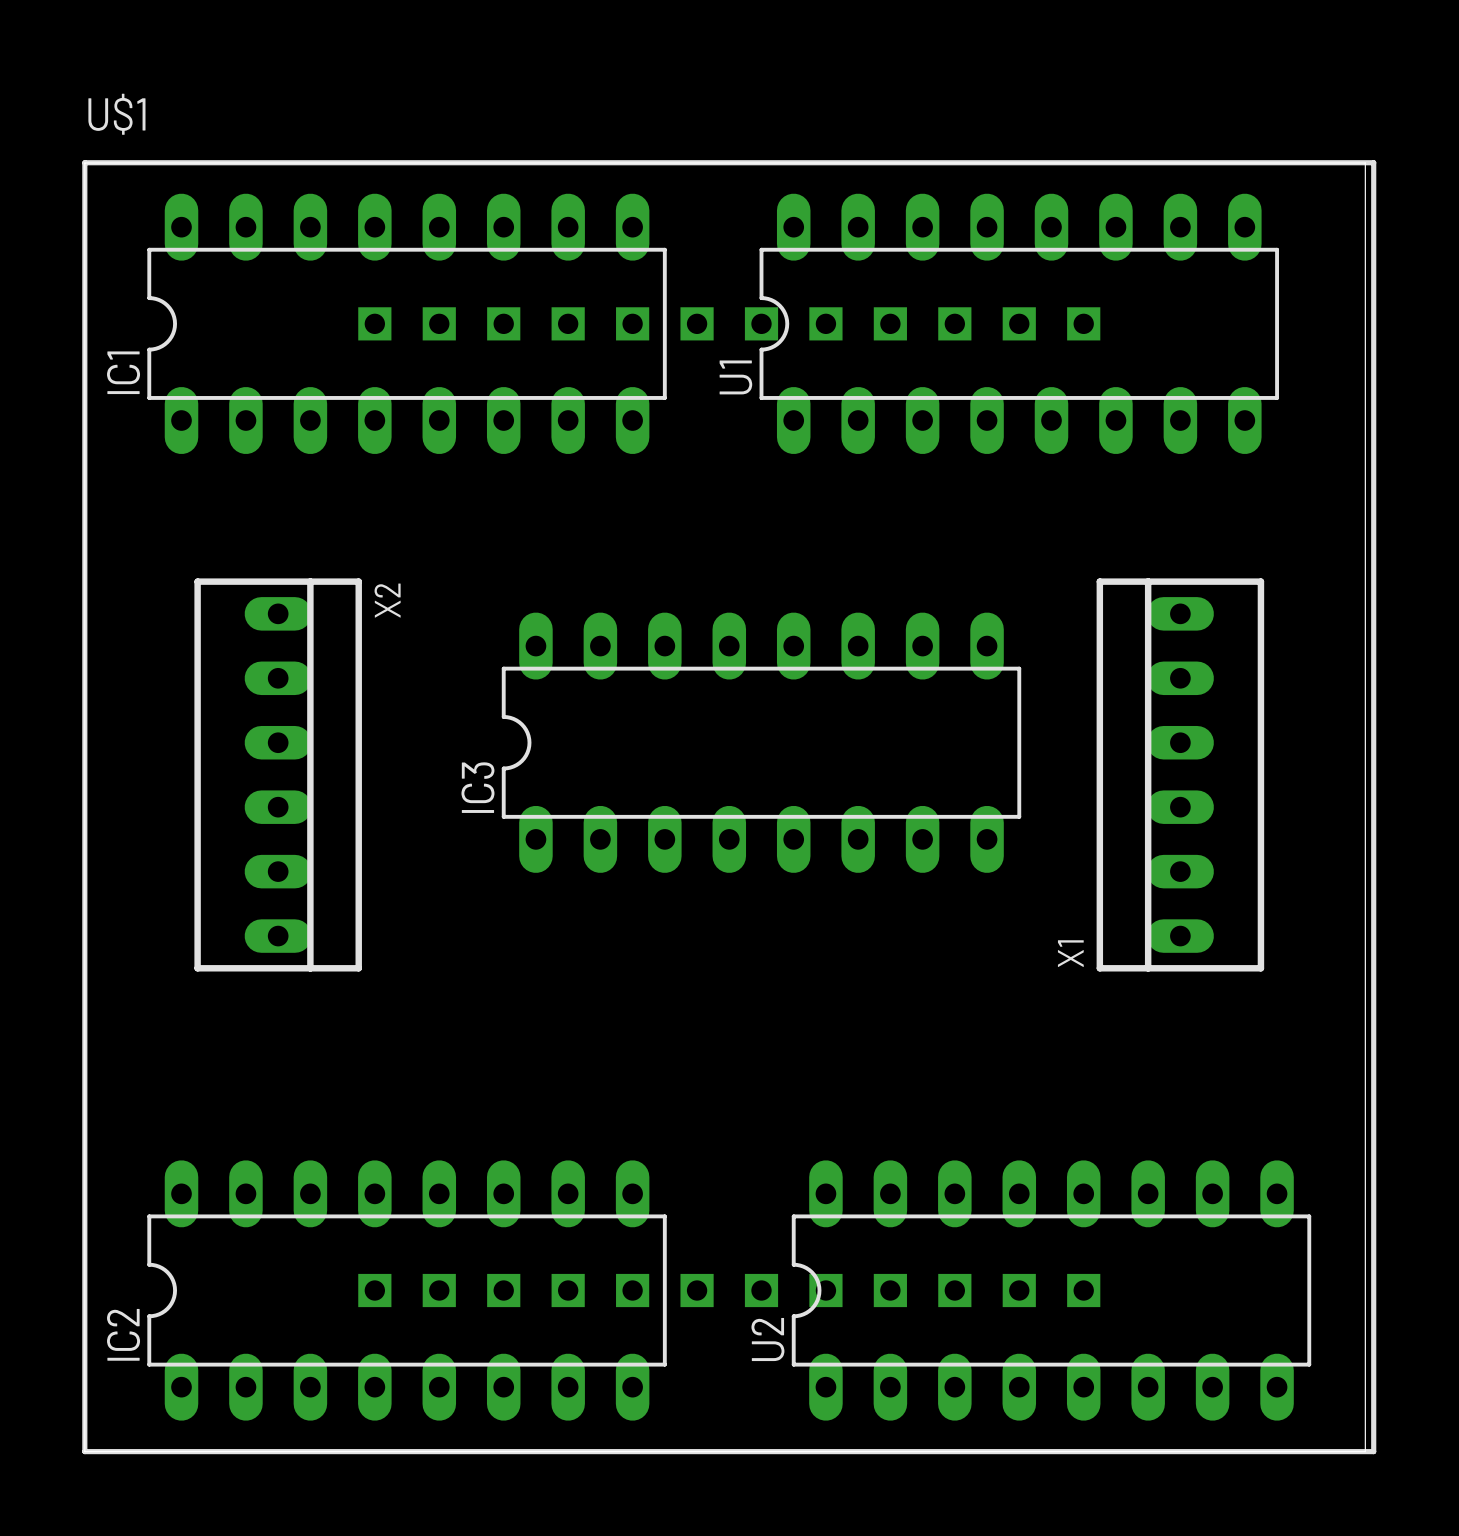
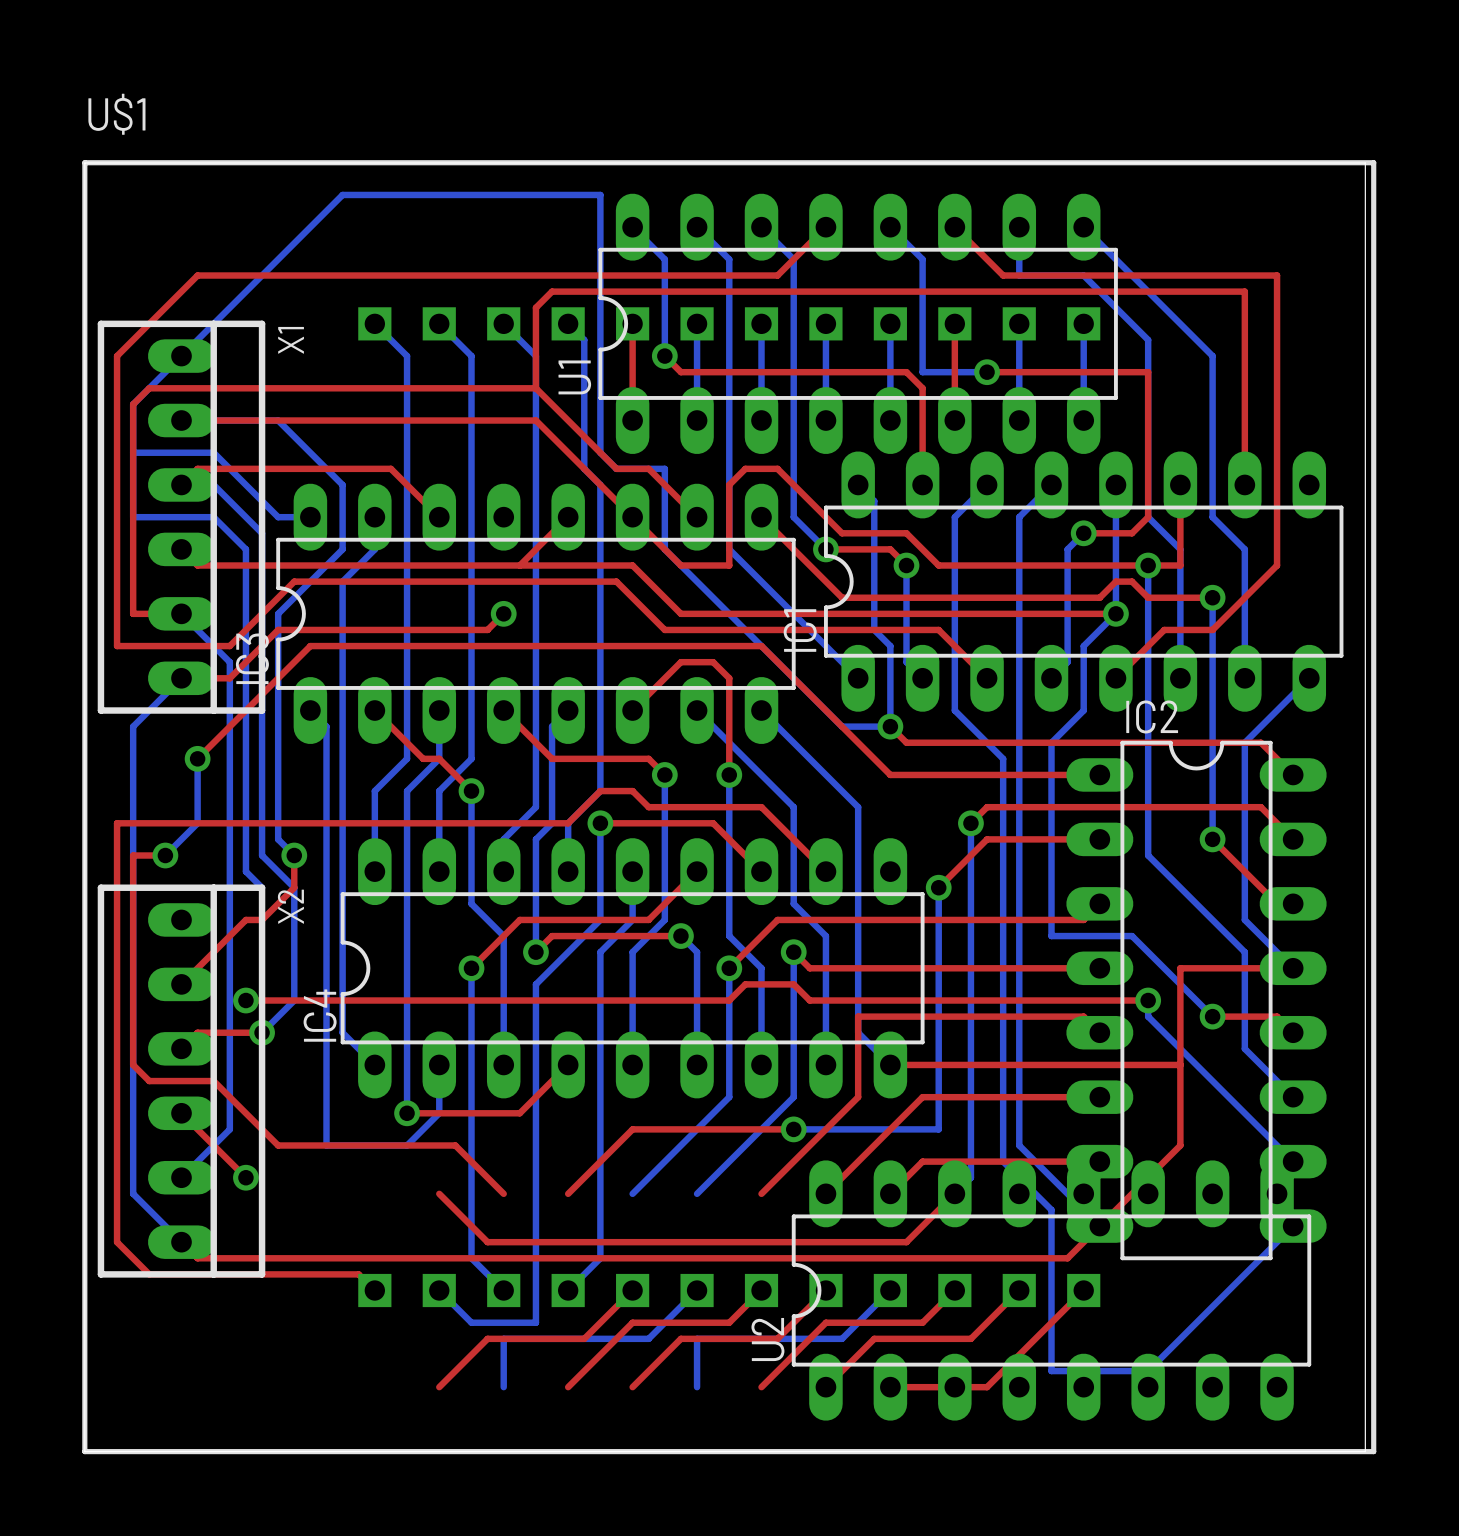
bottom track: none -> (632, 227) (664, 259) (664, 356)
bottom track: none -> (697, 227) (729, 259) (729, 549) (858, 678)
bottom track: none -> (761, 227) (793, 259) (793, 517) (825, 549)
top track: none -> (825, 227) (777, 275) (197, 275) (117, 356) (117, 646) (229, 646) (294, 581) (616, 581) (664, 629) (938, 629) (987, 678)
bottom track: none -> (890, 227) (922, 259) (922, 372) (987, 372)
top track: none -> (954, 227) (1003, 275) (1277, 275) (1277, 565) (1212, 629) (1164, 629) (1115, 678)
bottom track: none -> (1019, 227) (1019, 275) (1083, 275) (1148, 339) (1148, 517) (1180, 549) (1180, 678)
bottom track: none -> (1083, 227) (1212, 356) (1212, 517) (1244, 549) (1244, 678)
bottom track: none -> (374, 323) (407, 356) (407, 758) (374, 791) (374, 871)
IC1 position: (407, 323) -> (1083, 581)
bottom track: none -> (439, 323) (471, 356) (471, 758) (439, 791) (439, 871)
bottom track: none -> (503, 323) (535, 356) (535, 807) (503, 839) (503, 871)
bottom track: none -> (568, 323) (584, 339) (584, 468) (600, 484) (600, 791) (568, 823) (568, 871)
top track: none -> (632, 323) (632, 420)
bottom track: none -> (697, 323) (697, 420)
bottom track: none -> (761, 323) (761, 420)
bottom track: none -> (825, 323) (825, 420)
bottom track: none -> (890, 323) (890, 420)
top track: none -> (954, 323) (954, 420)
bottom track: none -> (1019, 323) (1019, 420)
U1 position: (1019, 323) -> (858, 323)
bottom track: none -> (1083, 323) (1083, 420)
top track: none -> (664, 356) (680, 372) (906, 372) (922, 388) (922, 484)
via: none -> (664, 356)
top track: none -> (987, 372) (1148, 372) (1148, 517) (1132, 533) (1083, 533)
via: none -> (987, 372)
top track: none -> (535, 388) (616, 468) (648, 468) (697, 517)
top track: none -> (535, 388) (149, 388) (133, 404) (133, 613) (181, 613)
top track: none -> (535, 388) (535, 307) (552, 291) (1244, 291) (1244, 484)
top track: none -> (181, 420) (535, 420) (680, 565) (729, 565) (729, 484) (745, 468) (777, 468) (842, 533) (906, 533) (938, 565) (1180, 565) (1180, 484)
bottom track: none -> (181, 420) (278, 420) (342, 484) (342, 549) (278, 613) (278, 839) (294, 855)
bottom track: none -> (133, 452) (213, 452) (278, 517) (310, 517)
top track: none -> (181, 484) (197, 468) (390, 468) (439, 517)
bottom track: none -> (181, 484) (213, 484) (262, 533) (262, 855) (294, 887) (294, 1000) (262, 1032)
bottom track: none -> (858, 484) (874, 501) (874, 629) (890, 646) (890, 726) (842, 726) (664, 549) (664, 468) (616, 468) (600, 452) (600, 194) (342, 194) (133, 404) (133, 517) (213, 517) (245, 549) (245, 871) (262, 887)
bottom track: none -> (987, 484) (954, 517) (954, 710) (1003, 758) (1003, 1161) (1051, 1209) (1051, 1371) (1148, 1371) (1293, 1226)
bottom track: none -> (1051, 484) (1019, 517) (1019, 1145) (1099, 1226)
bottom track: none -> (1115, 484) (1115, 613) (1083, 646) (1083, 710) (1051, 742) (1051, 936) (1132, 936) (1212, 1016)
bottom track: none -> (374, 517) (374, 549) (342, 581) (342, 1032) (374, 1064)
top track: none -> (568, 517) (519, 565)
top track: none -> (761, 517) (842, 597) (1099, 597) (1115, 581) (1132, 581) (1148, 597) (1212, 597)
bottom track: none -> (1083, 533) (1067, 549) (1067, 662) (1051, 678)
via: none -> (1083, 533)
top track: none -> (181, 549) (197, 565) (632, 565) (680, 613) (1115, 613)
top track: none -> (825, 549) (890, 549) (906, 565)
via: none -> (825, 549)
bottom track: none -> (906, 565) (906, 662) (922, 678)
via: none -> (906, 565)
bottom track: none -> (1148, 565) (1148, 855) (1244, 952) (1244, 1048) (1293, 1097)
via: none -> (1148, 565)
bottom track: none -> (1212, 597) (1212, 839)
via: none -> (1212, 597)
bottom track: none -> (181, 613) (229, 662) (229, 1129) (181, 1177)
top track: none -> (503, 613) (487, 629) (278, 629) (229, 678) (181, 678)
via: none -> (503, 613)
via: none -> (1115, 613)
bottom track: none -> (181, 678) (133, 726) (133, 1193) (181, 1242)
bottom track: none -> (1309, 678) (1244, 742) (1244, 919) (1293, 968)
bottom track: none -> (310, 710) (326, 726) (326, 1145) (407, 1145) (439, 1113) (439, 1064)
top track: none -> (374, 710) (423, 758) (439, 758) (471, 791)
bottom track: none -> (439, 710) (439, 758) (407, 791) (407, 1113)
top track: none -> (503, 710) (552, 758) (648, 758) (664, 774)
bottom track: none -> (568, 710) (552, 726) (552, 823) (535, 839) (535, 952)
top track: none -> (632, 710) (680, 662) (713, 662) (729, 678) (729, 774)
bottom track: none -> (697, 710) (793, 807) (793, 903) (825, 936) (825, 1064)
bottom track: none -> (761, 710) (858, 807) (858, 1032) (890, 1064)
top track: none -> (890, 726) (906, 742) (1260, 742) (1293, 774)
via: none -> (890, 726)
IC3 position: (761, 742) -> (535, 613)
top track: none -> (197, 758) (310, 646) (761, 646) (890, 774) (1099, 774)
bottom track: none -> (197, 758) (197, 823) (165, 855)
via: none -> (197, 758)
X2 position: (278, 774) -> (181, 1081)
bottom track: none -> (664, 774) (664, 919) (632, 952) (632, 1064)
via: none -> (664, 774)
bottom track: none -> (729, 774) (729, 936) (761, 968) (761, 1064)
via: none -> (729, 774)
X1 rotation: 0° (1180, 774) -> 180° (181, 517)
X1 position: (1180, 774) -> (181, 517)
bottom track: none -> (471, 791) (471, 903) (503, 936) (503, 1064)
via: none -> (471, 791)
top track: none -> (600, 823) (713, 823) (761, 871)
bottom track: none -> (600, 823) (600, 919) (535, 984) (535, 1322) (471, 1322) (439, 1290)
via: none -> (600, 823)
top track: none -> (970, 823) (987, 807) (1260, 807) (1293, 839)
bottom track: none -> (970, 823) (970, 1177) (954, 1193)
via: none -> (970, 823)
top track: none -> (1099, 839) (987, 839) (938, 887)
top track: none -> (1212, 839) (1277, 903) (1293, 903)
via: none -> (1212, 839)
top track: none -> (165, 855) (133, 855) (133, 1064) (149, 1081) (213, 1081) (278, 1145) (455, 1145) (503, 1193)
via: none -> (165, 855)
top track: none -> (294, 855) (294, 887) (262, 919) (245, 919) (181, 984)
via: none -> (294, 855)
bottom track: none -> (632, 871) (632, 919) (600, 952) (600, 1258) (568, 1290)
top track: none -> (697, 871) (648, 919) (519, 919) (471, 968)
top track: none -> (825, 871) (761, 807) (648, 807) (632, 791) (600, 791) (568, 823) (117, 823) (117, 1242) (149, 1274) (358, 1274) (374, 1290)
bottom track: none -> (938, 887) (938, 1129) (793, 1129)
via: none -> (938, 887)
top track: none -> (1099, 903) (1083, 919) (777, 919) (729, 968)
top track: none -> (680, 936) (552, 936) (535, 952)
bottom track: none -> (680, 936) (697, 952) (697, 1064)
via: none -> (680, 936)
via: none -> (535, 952)
top track: none -> (793, 952) (809, 968) (1099, 968)
bottom track: none -> (793, 952) (793, 1097) (697, 1193)
via: none -> (793, 952)
bottom track: none -> (471, 968) (471, 1258) (503, 1290)
via: none -> (471, 968)
IC4: none -> (632, 968)
bottom track: none -> (729, 968) (729, 1097) (632, 1193)
via: none -> (729, 968)
top track: none -> (1293, 968) (1180, 968) (1180, 1145) (1067, 1258) (197, 1258) (181, 1242)
top track: none -> (245, 1000) (729, 1000) (745, 984) (793, 984) (809, 1000) (1148, 1000)
via: none -> (245, 1000)
bottom track: none -> (1148, 1000) (1148, 1016) (1293, 1161)
via: none -> (1148, 1000)
top track: none -> (1212, 1016) (1277, 1016) (1293, 1032)
via: none -> (1212, 1016)
top track: none -> (262, 1032) (197, 1032) (181, 1048)
via: none -> (262, 1032)
top track: none -> (1099, 1032) (1083, 1016) (858, 1016) (858, 1097) (761, 1193)
top track: none -> (568, 1064) (519, 1113) (407, 1113)
top track: none -> (890, 1064) (1180, 1064)
top track: none -> (1099, 1097) (922, 1097) (825, 1193)
top track: none -> (181, 1113) (245, 1177)
via: none -> (407, 1113)
top track: none -> (793, 1129) (632, 1129) (568, 1193)
via: none -> (793, 1129)
top track: none -> (1099, 1161) (922, 1161) (890, 1193)
via: none -> (245, 1177)
top track: none -> (439, 1193) (487, 1242) (906, 1242) (954, 1193)
IC2 rotation: 0° (407, 1290) -> 90° clockwise (1196, 1000)
IC2 position: (407, 1290) -> (1196, 1000)
top track: none -> (632, 1290) (584, 1338) (487, 1338) (439, 1387)
bottom track: none -> (697, 1290) (648, 1338) (503, 1338) (503, 1387)
top track: none -> (761, 1290) (729, 1322) (632, 1322) (568, 1387)
top track: none -> (825, 1290) (777, 1338) (680, 1338) (632, 1387)
bottom track: none -> (890, 1290) (842, 1338) (697, 1338) (697, 1387)
top track: none -> (954, 1290) (922, 1322) (825, 1322) (761, 1387)
top track: none -> (1019, 1290) (970, 1338) (874, 1338) (825, 1387)
top track: none -> (1083, 1290) (987, 1387) (890, 1387)

